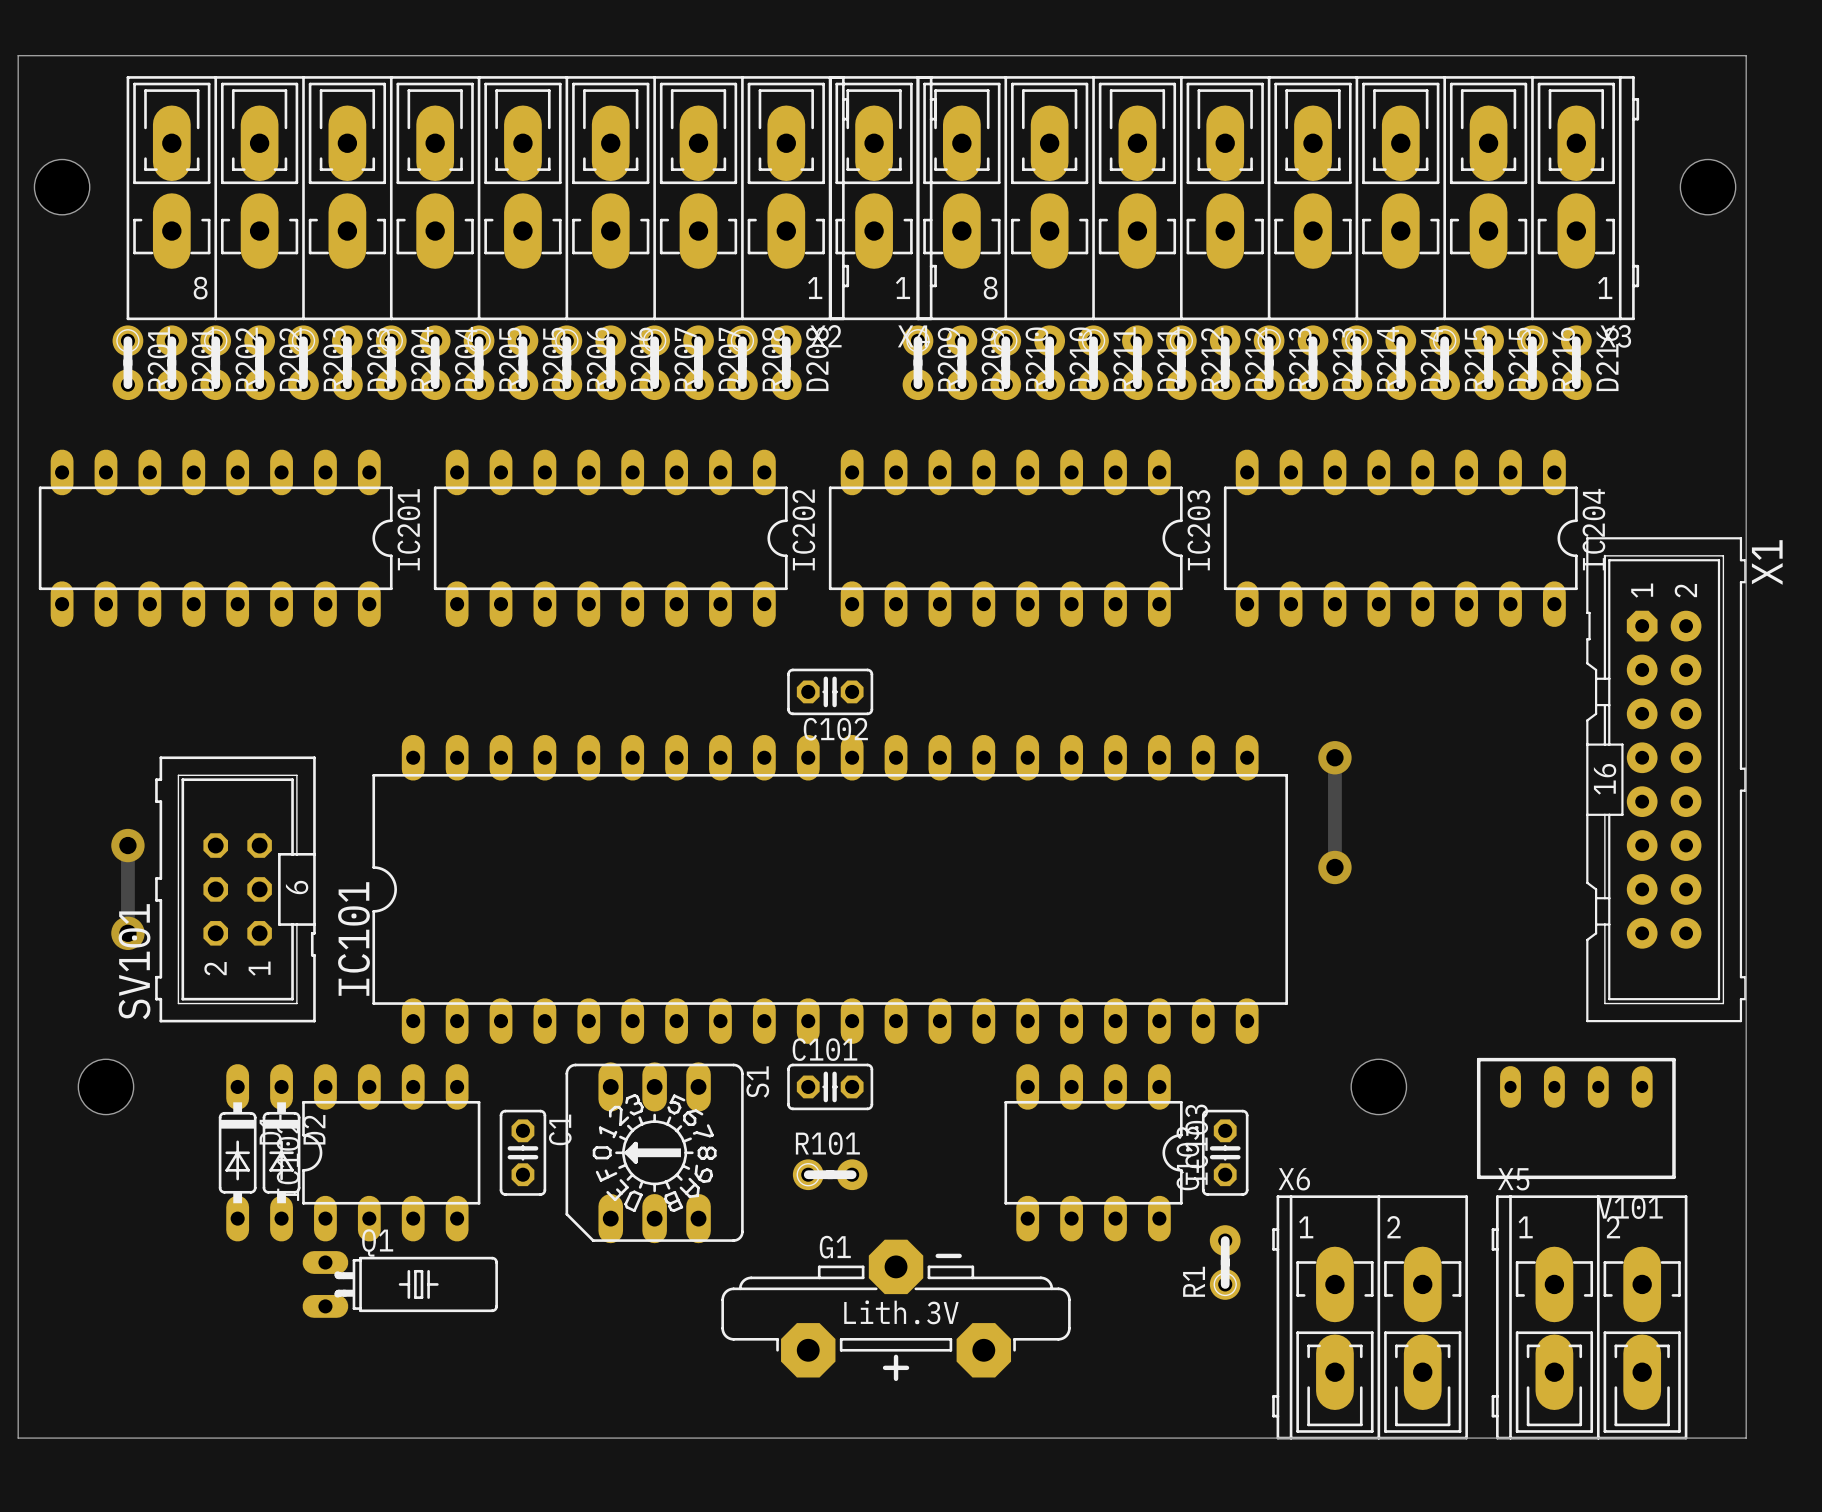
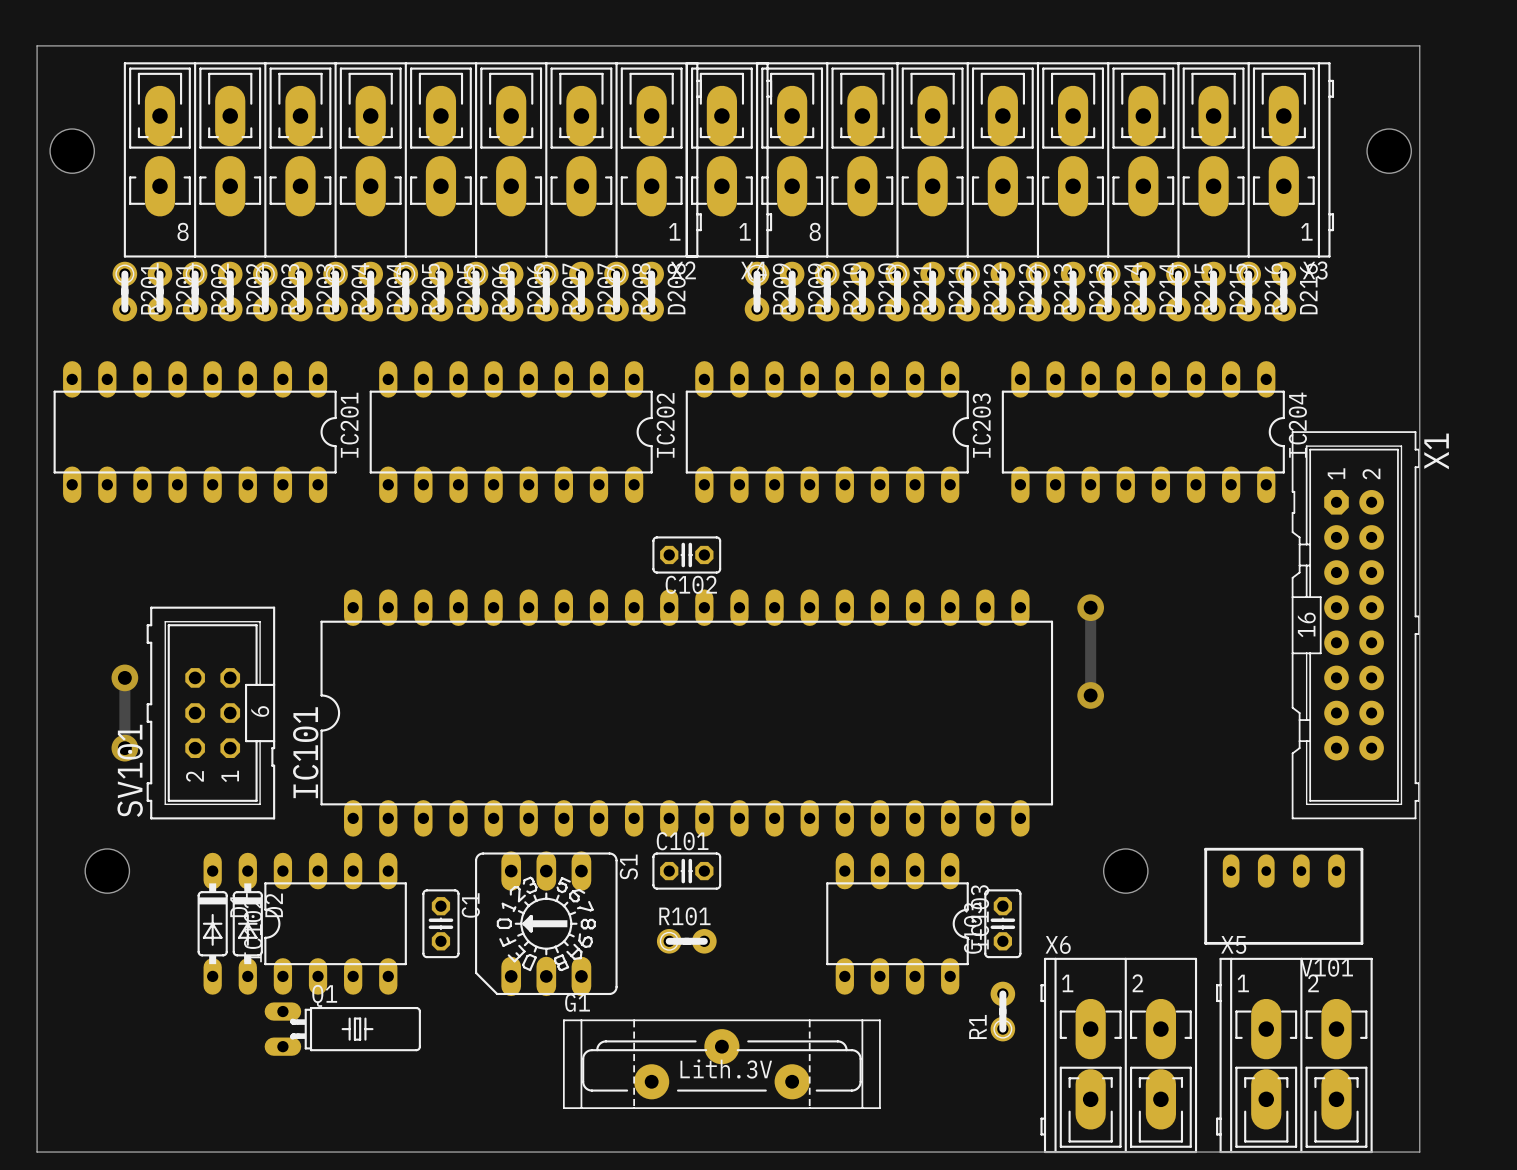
G1 footprint: [721, 1239, 1071, 1382] -> [562, 1019, 881, 1110]
G1 name position: G1 (835, 1247) -> G1 (577, 1002)

